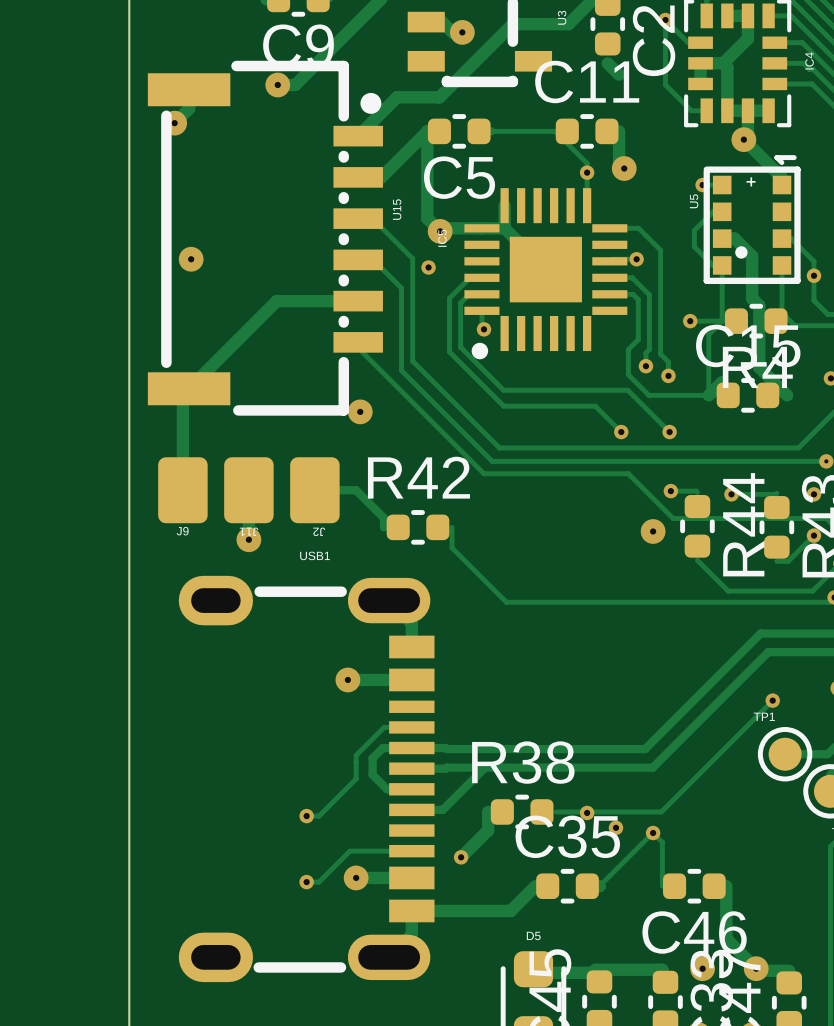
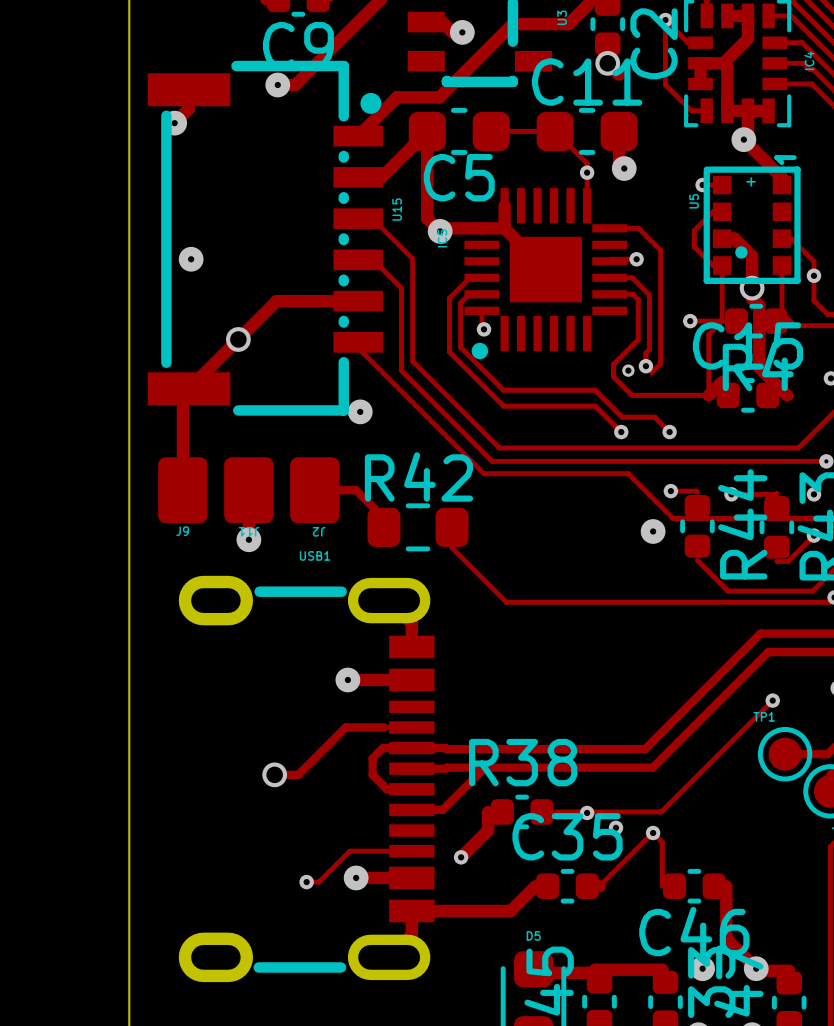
via: none -> (607, 63)
C5 footprint: [427, 114, 491, 149] -> [408, 107, 510, 155]
C11 footprint: [555, 114, 619, 149] -> [536, 107, 638, 155]
via: (428, 267) -> none
via: none -> (752, 288)
via: none -> (238, 339)
track: (628, 349) (628, 374) (648, 395) -> (628, 349) (613, 364) (613, 376) (632, 395) (648, 395)
track: (660, 354) (668, 361) (668, 375) -> (660, 354) (660, 363) (651, 372)
via: none -> (628, 370)
via: (668, 375) -> none
track: (595, 390) (627, 390) (654, 417) -> (595, 390) (622, 417) (654, 417)
R42 footprint: [386, 510, 450, 545] -> [367, 503, 469, 552]
track: (384, 727) (356, 755) (356, 778) (319, 816) (306, 816) -> (384, 727) (345, 727) (298, 774) (274, 774)
via: none -> (274, 774)
via: (306, 816) -> none

